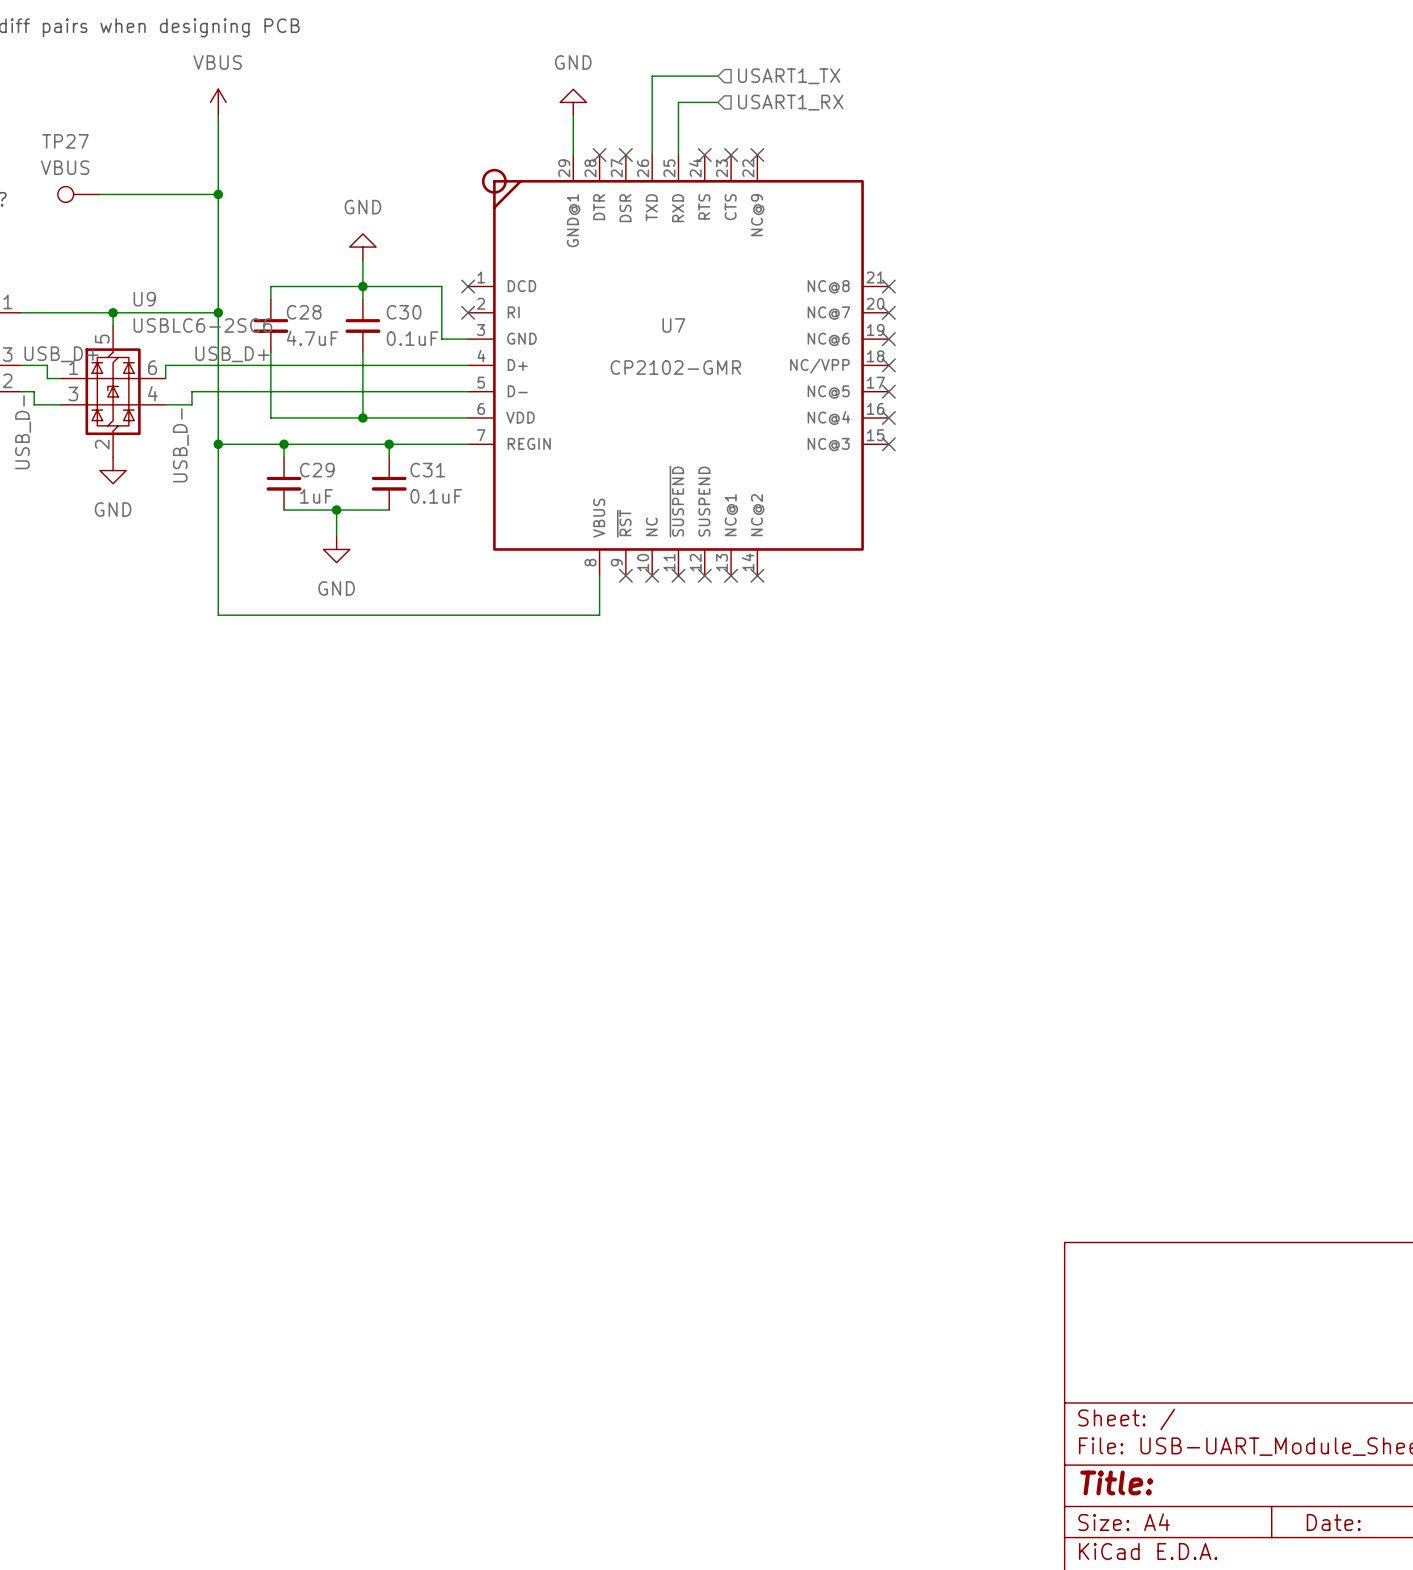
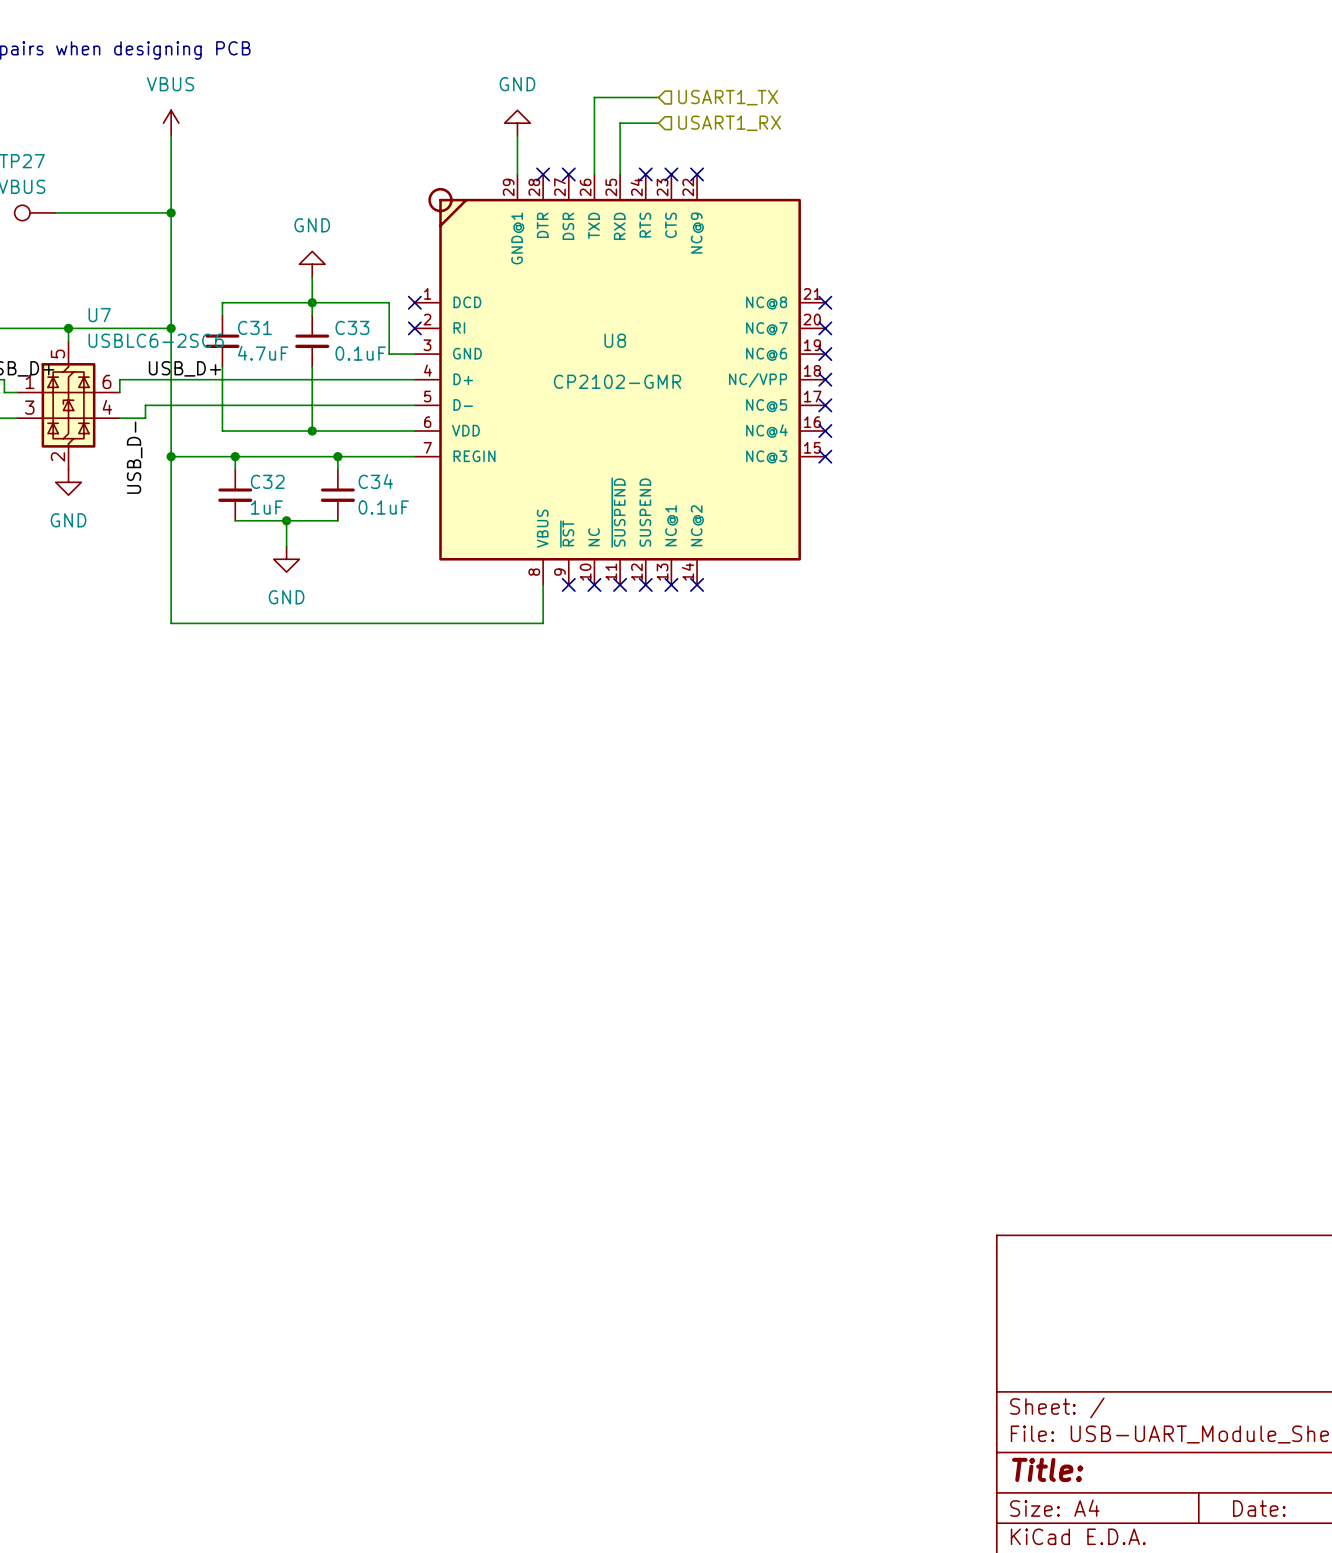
U9 name: U9 (144, 299) -> U7 (99, 315)
C28 name: C28 (304, 312) -> C31 (254, 327)
C30 name: C30 (404, 312) -> C33 (352, 327)
U7 name: U7 (673, 325) -> U8 (615, 340)
C29 name: C29 (317, 470) -> C32 (267, 481)
C31 name: C31 (427, 470) -> C34 (375, 481)

